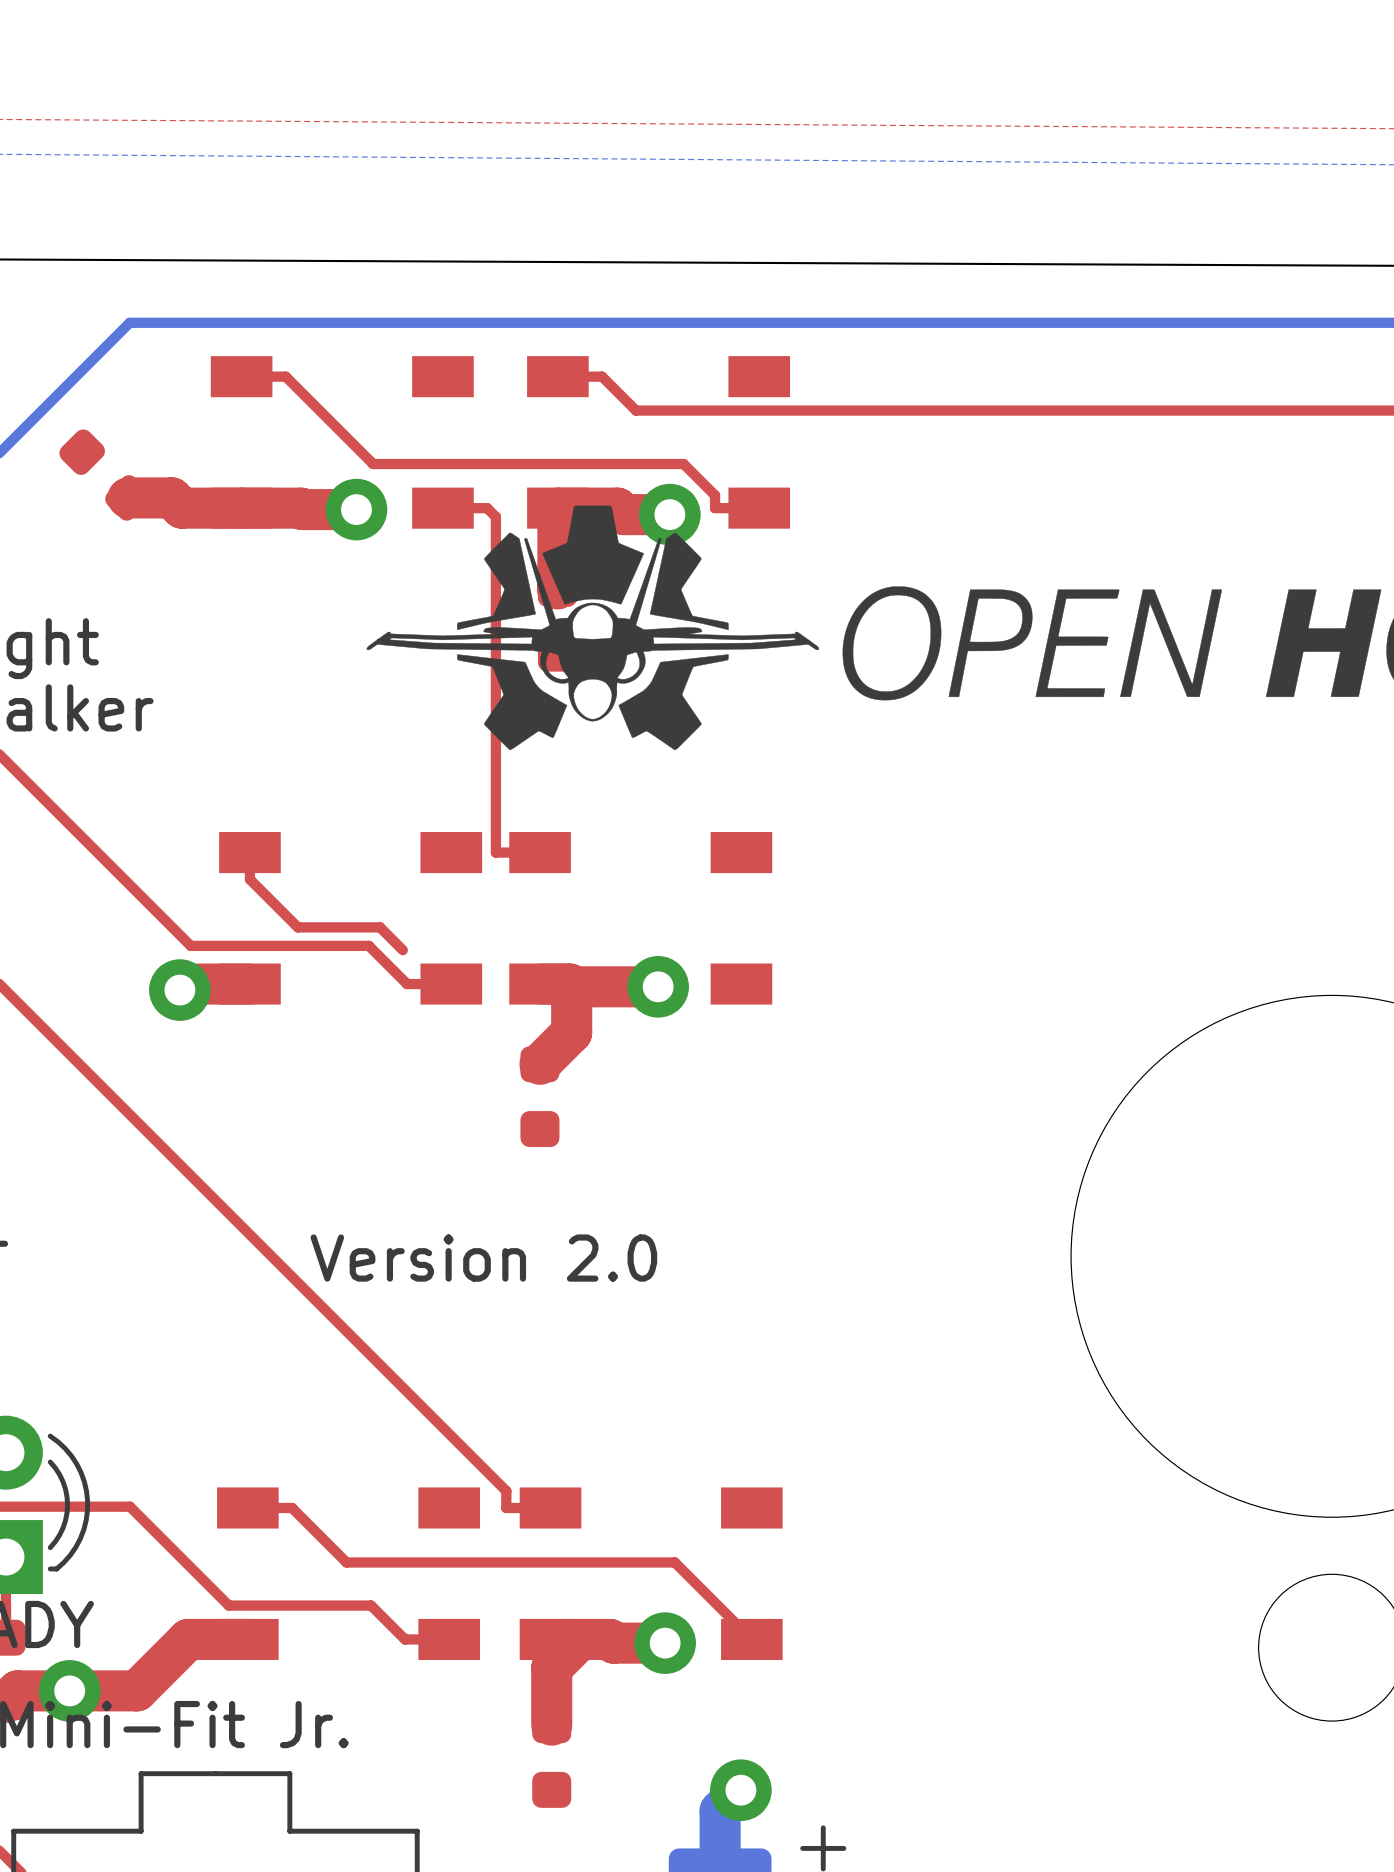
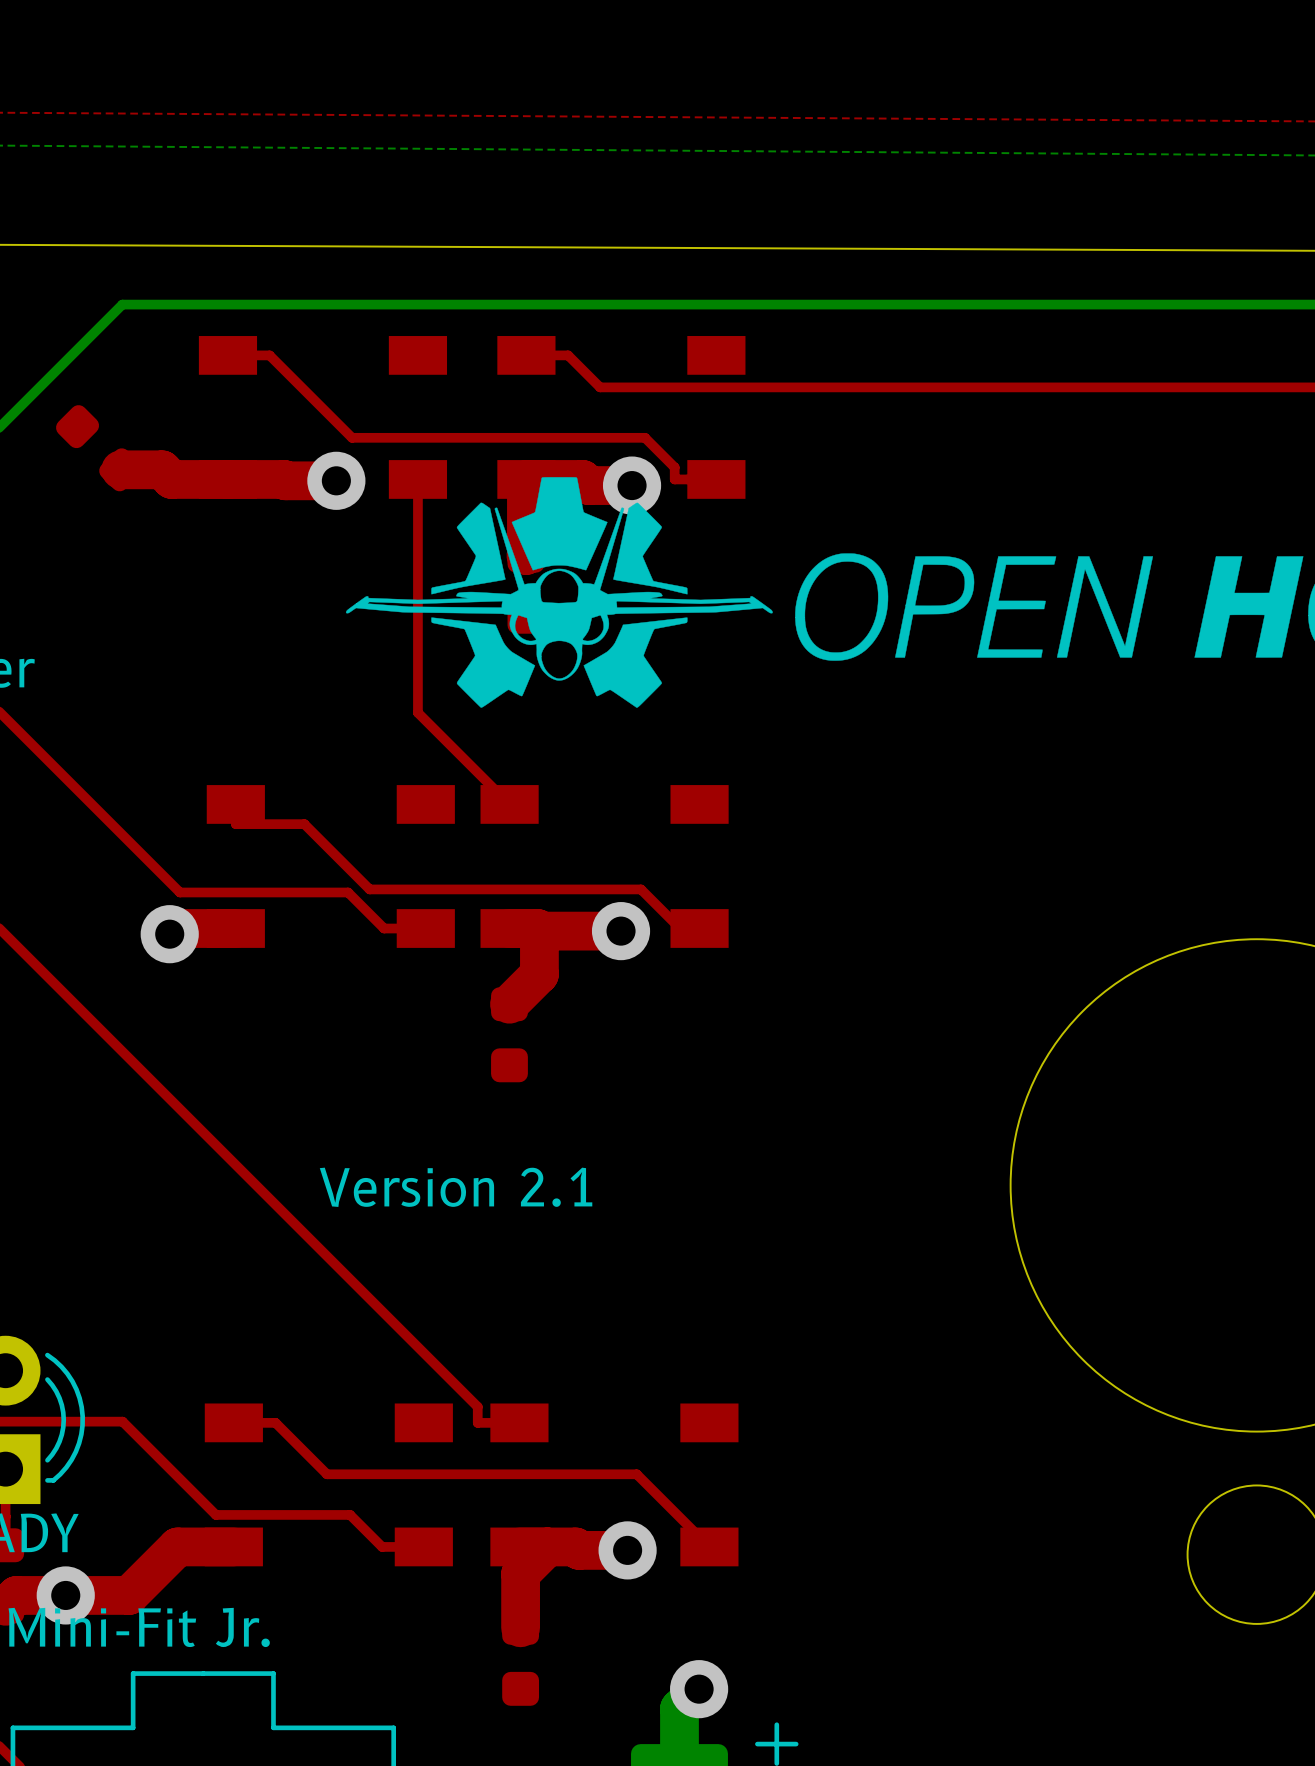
top track: (442, 508) (487, 508) (495, 516) (495, 852) (540, 852) -> (417, 479) (417, 712) (509, 804)
top track: (249, 873) (249, 879) (297, 927) (380, 927) (402, 950) -> (235, 824) (304, 824) (369, 889) (641, 889) (680, 928) (699, 928)
text: Version 2.0 (483, 1258) -> Version 2.1 (456, 1187)

